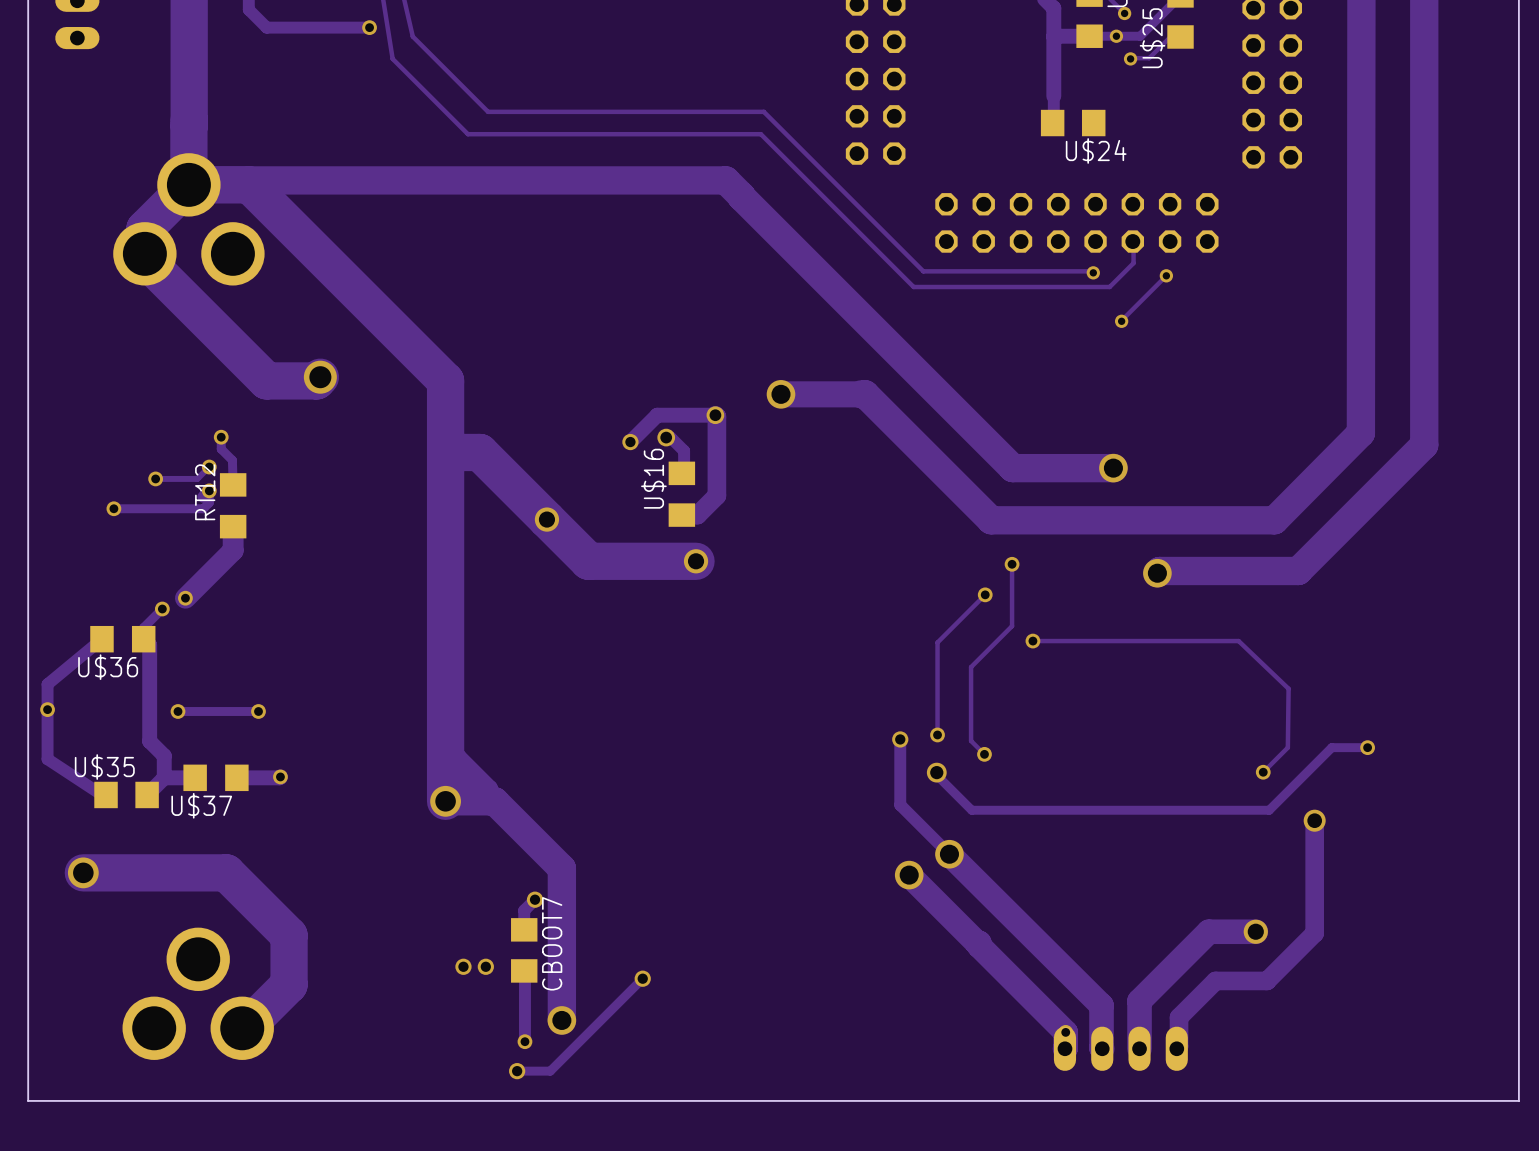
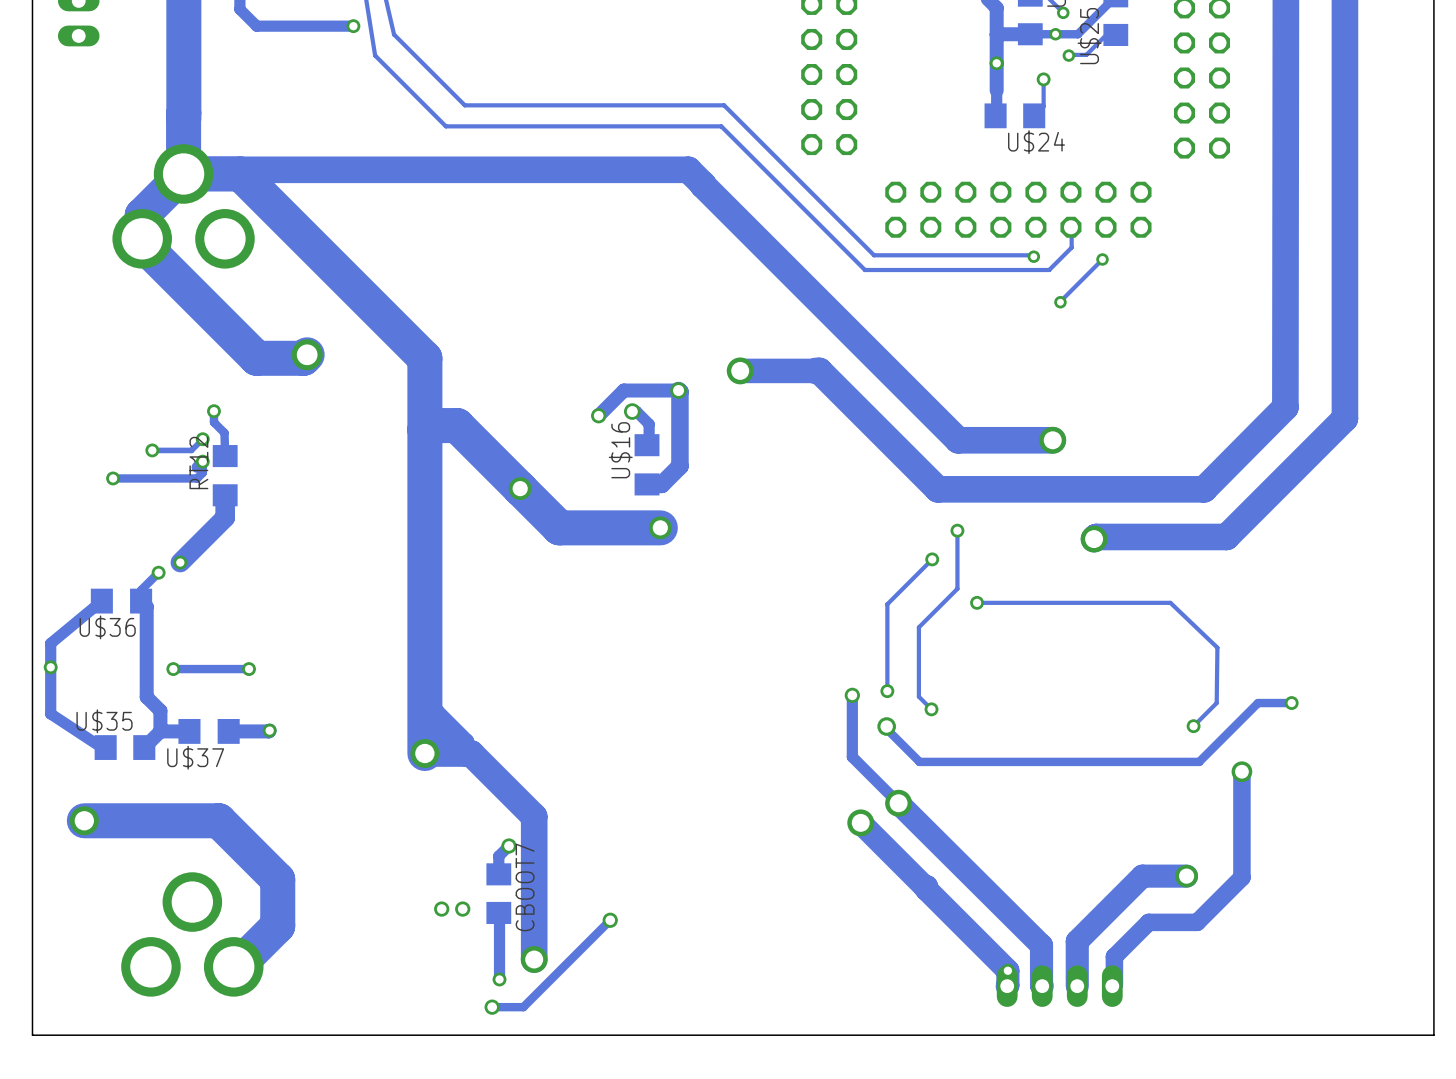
via: none -> (996, 63)
track: none -> (1043, 79) (1043, 106) (1034, 115)
via: none -> (1043, 79)

